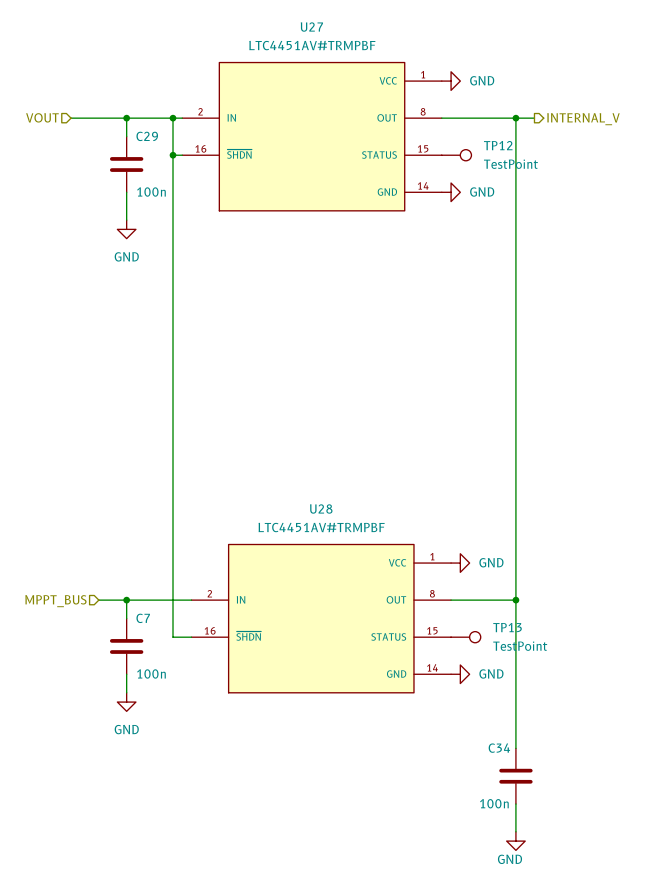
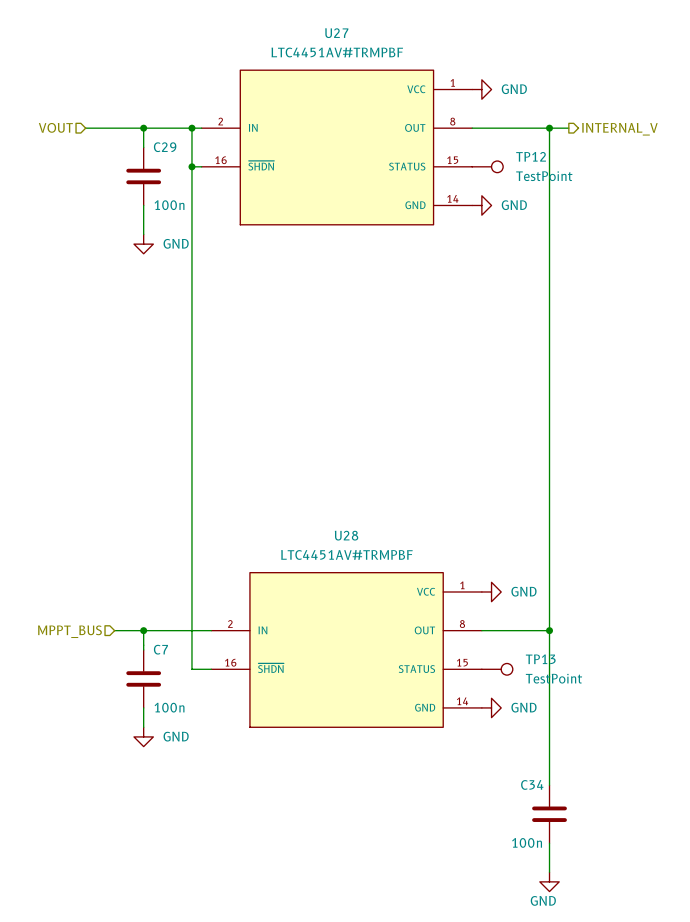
power symbol text position: GND (126, 256) -> GND (176, 243)
power symbol text position: GND (126, 729) -> GND (176, 736)

